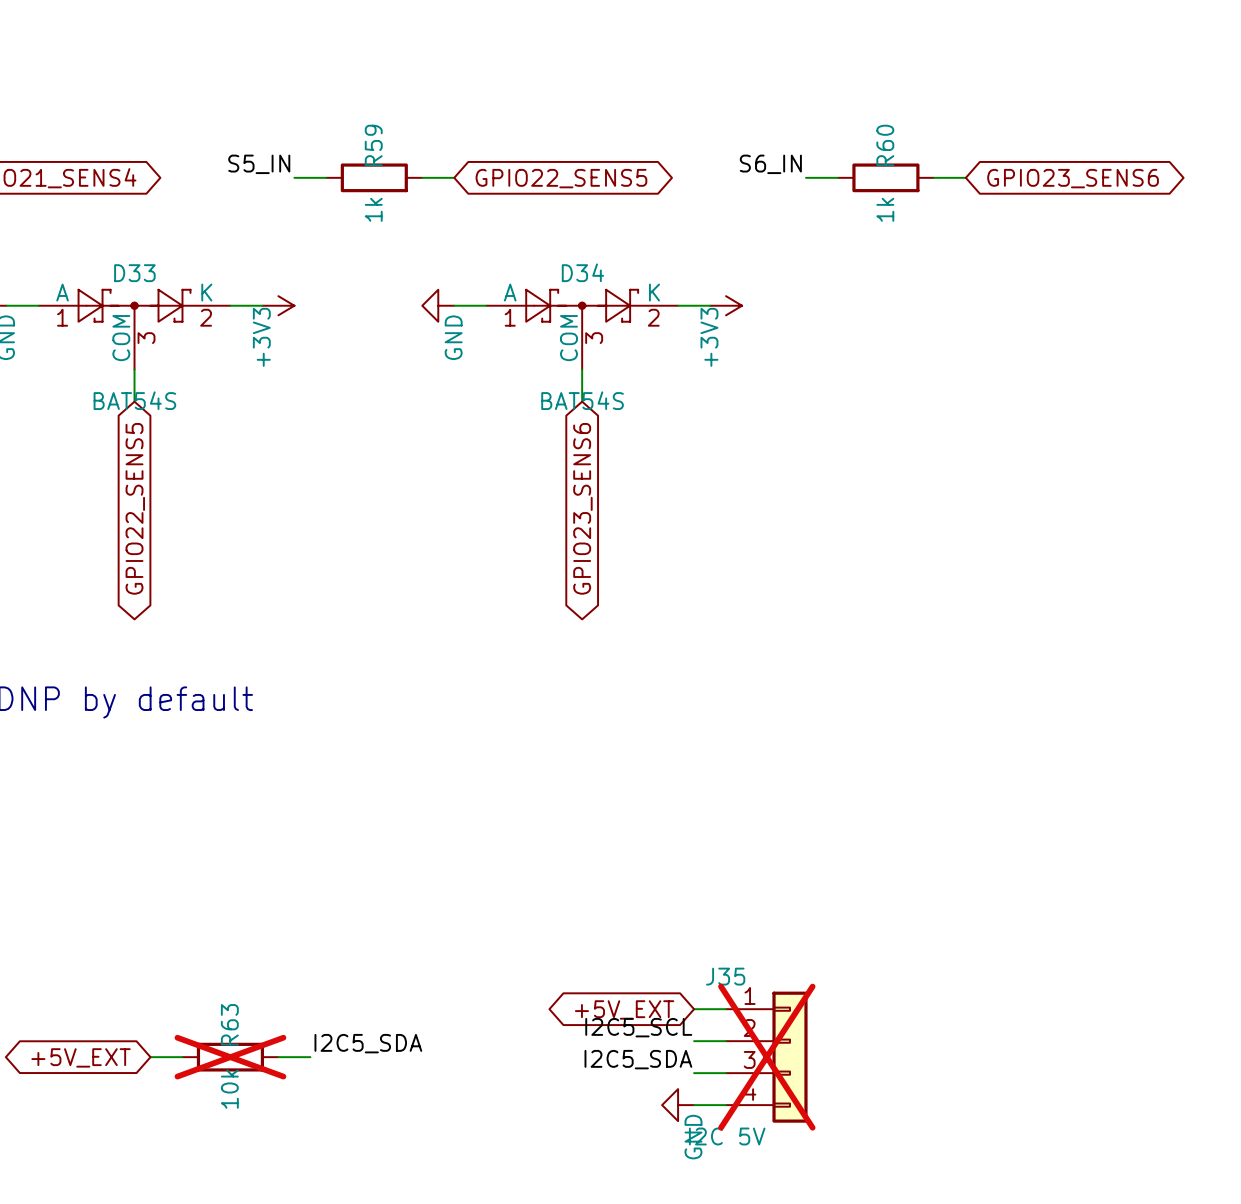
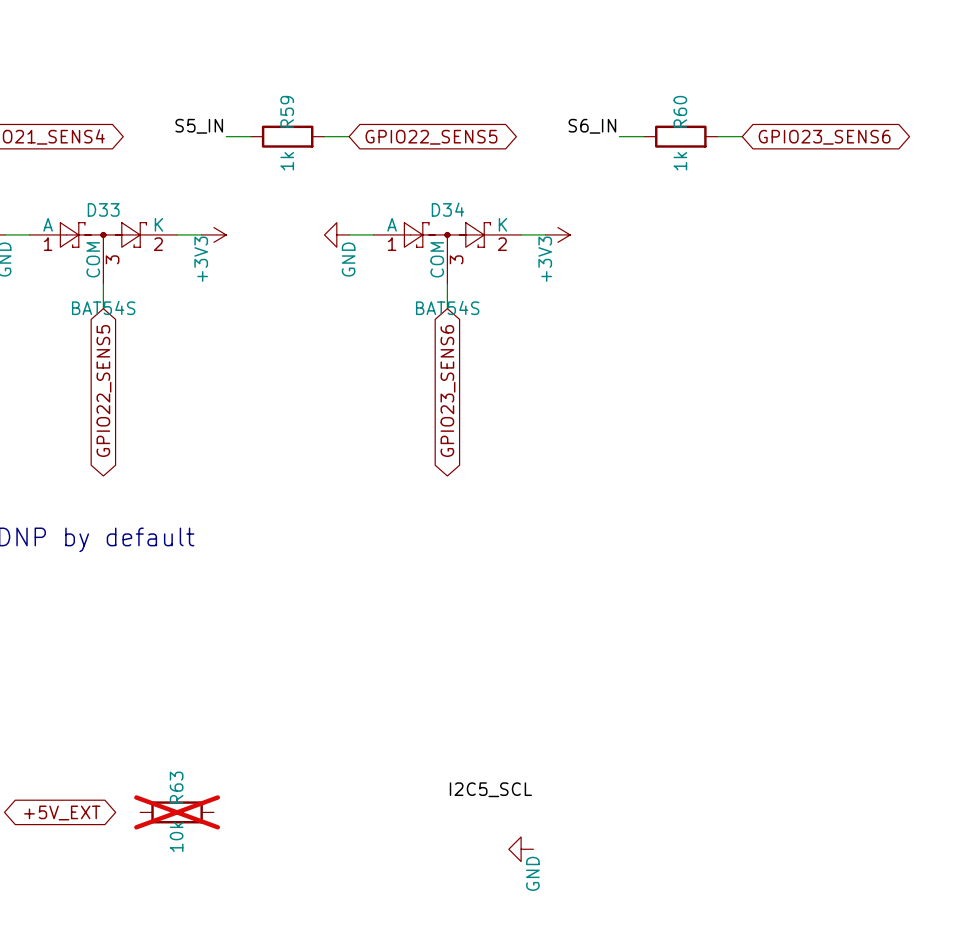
global label: +5V_EXT (624, 1009) -> none
wire: (694, 1009) (726, 1009) -> none
wire: (694, 1041) (726, 1041) -> none
label: I2C5_SDA (368, 1043) -> none
wire: (150, 1057) (182, 1057) -> none
wire: (278, 1057) (310, 1057) -> none
J35: I2C 5V (766, 1057) -> none
label: I2C5_SDA (638, 1059) -> none
wire: (694, 1073) (726, 1073) -> none
wire: (694, 1105) (726, 1105) -> none

